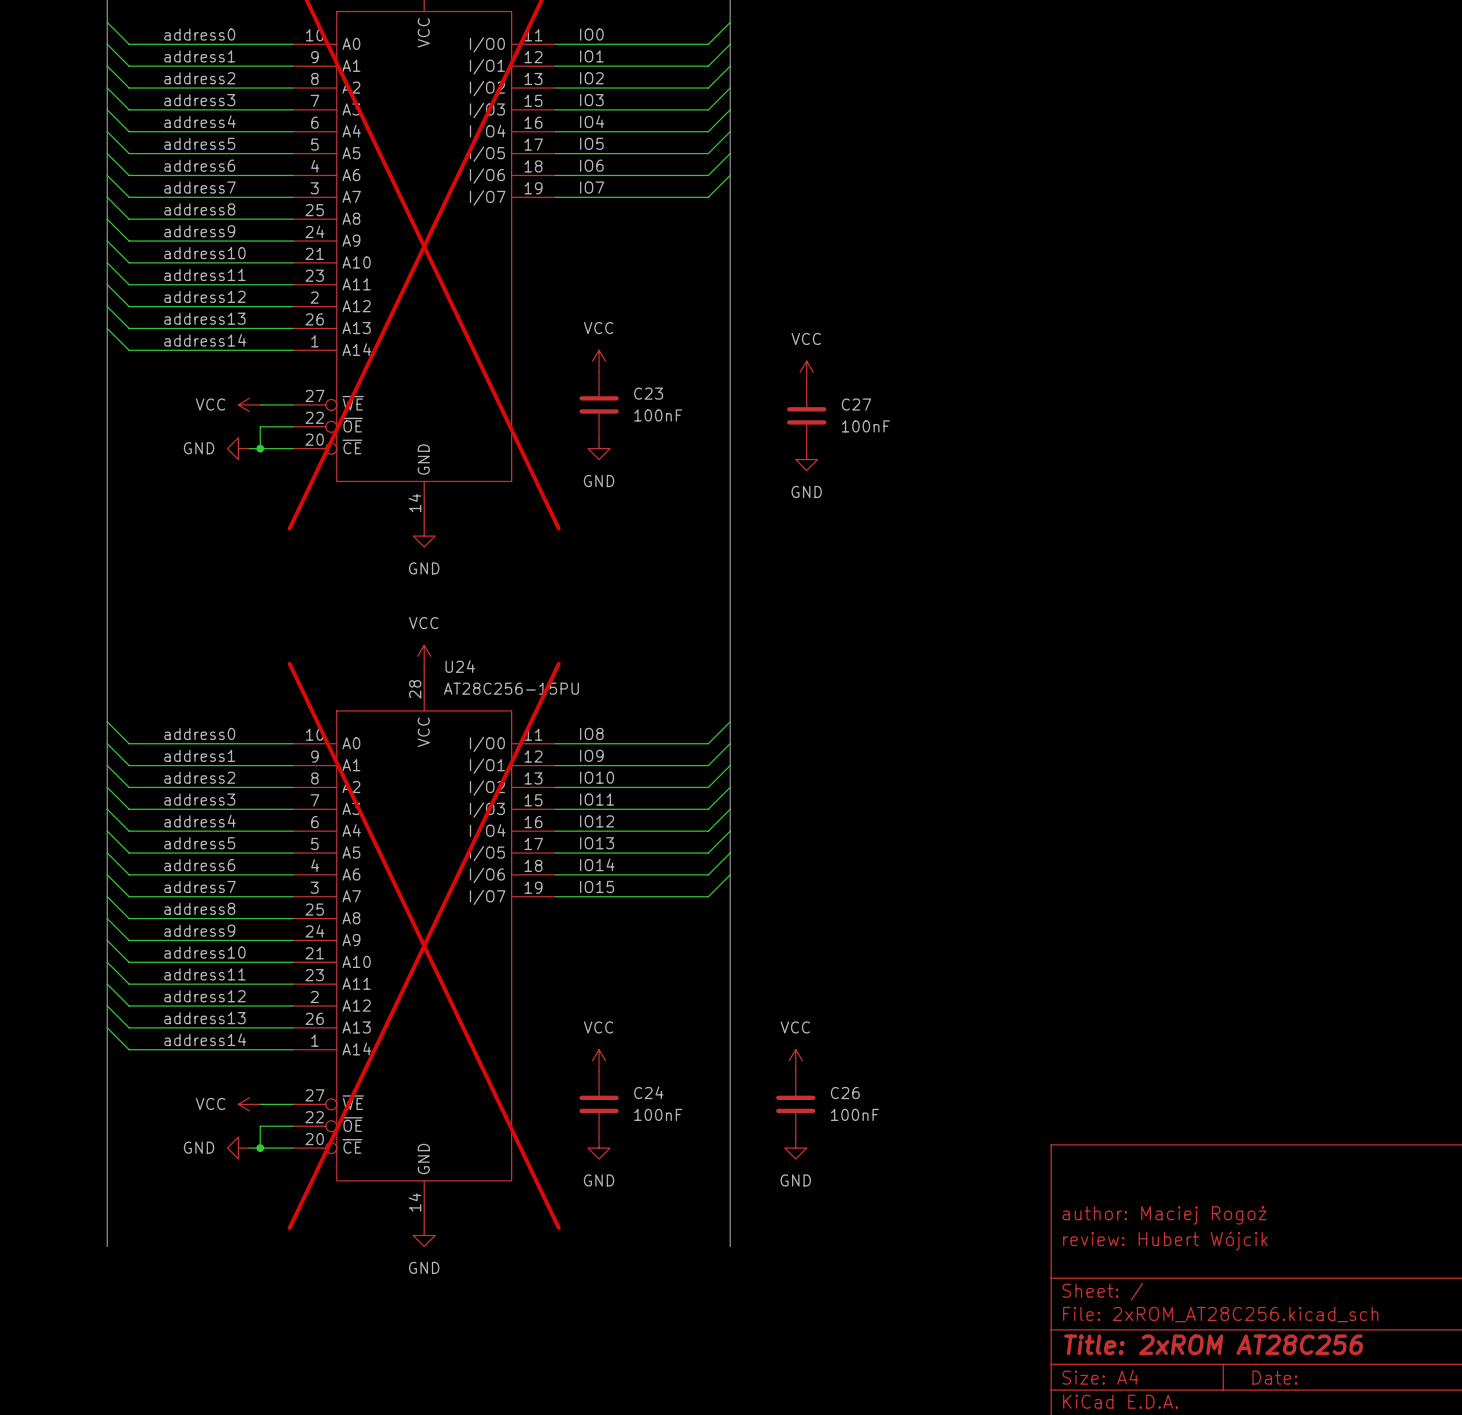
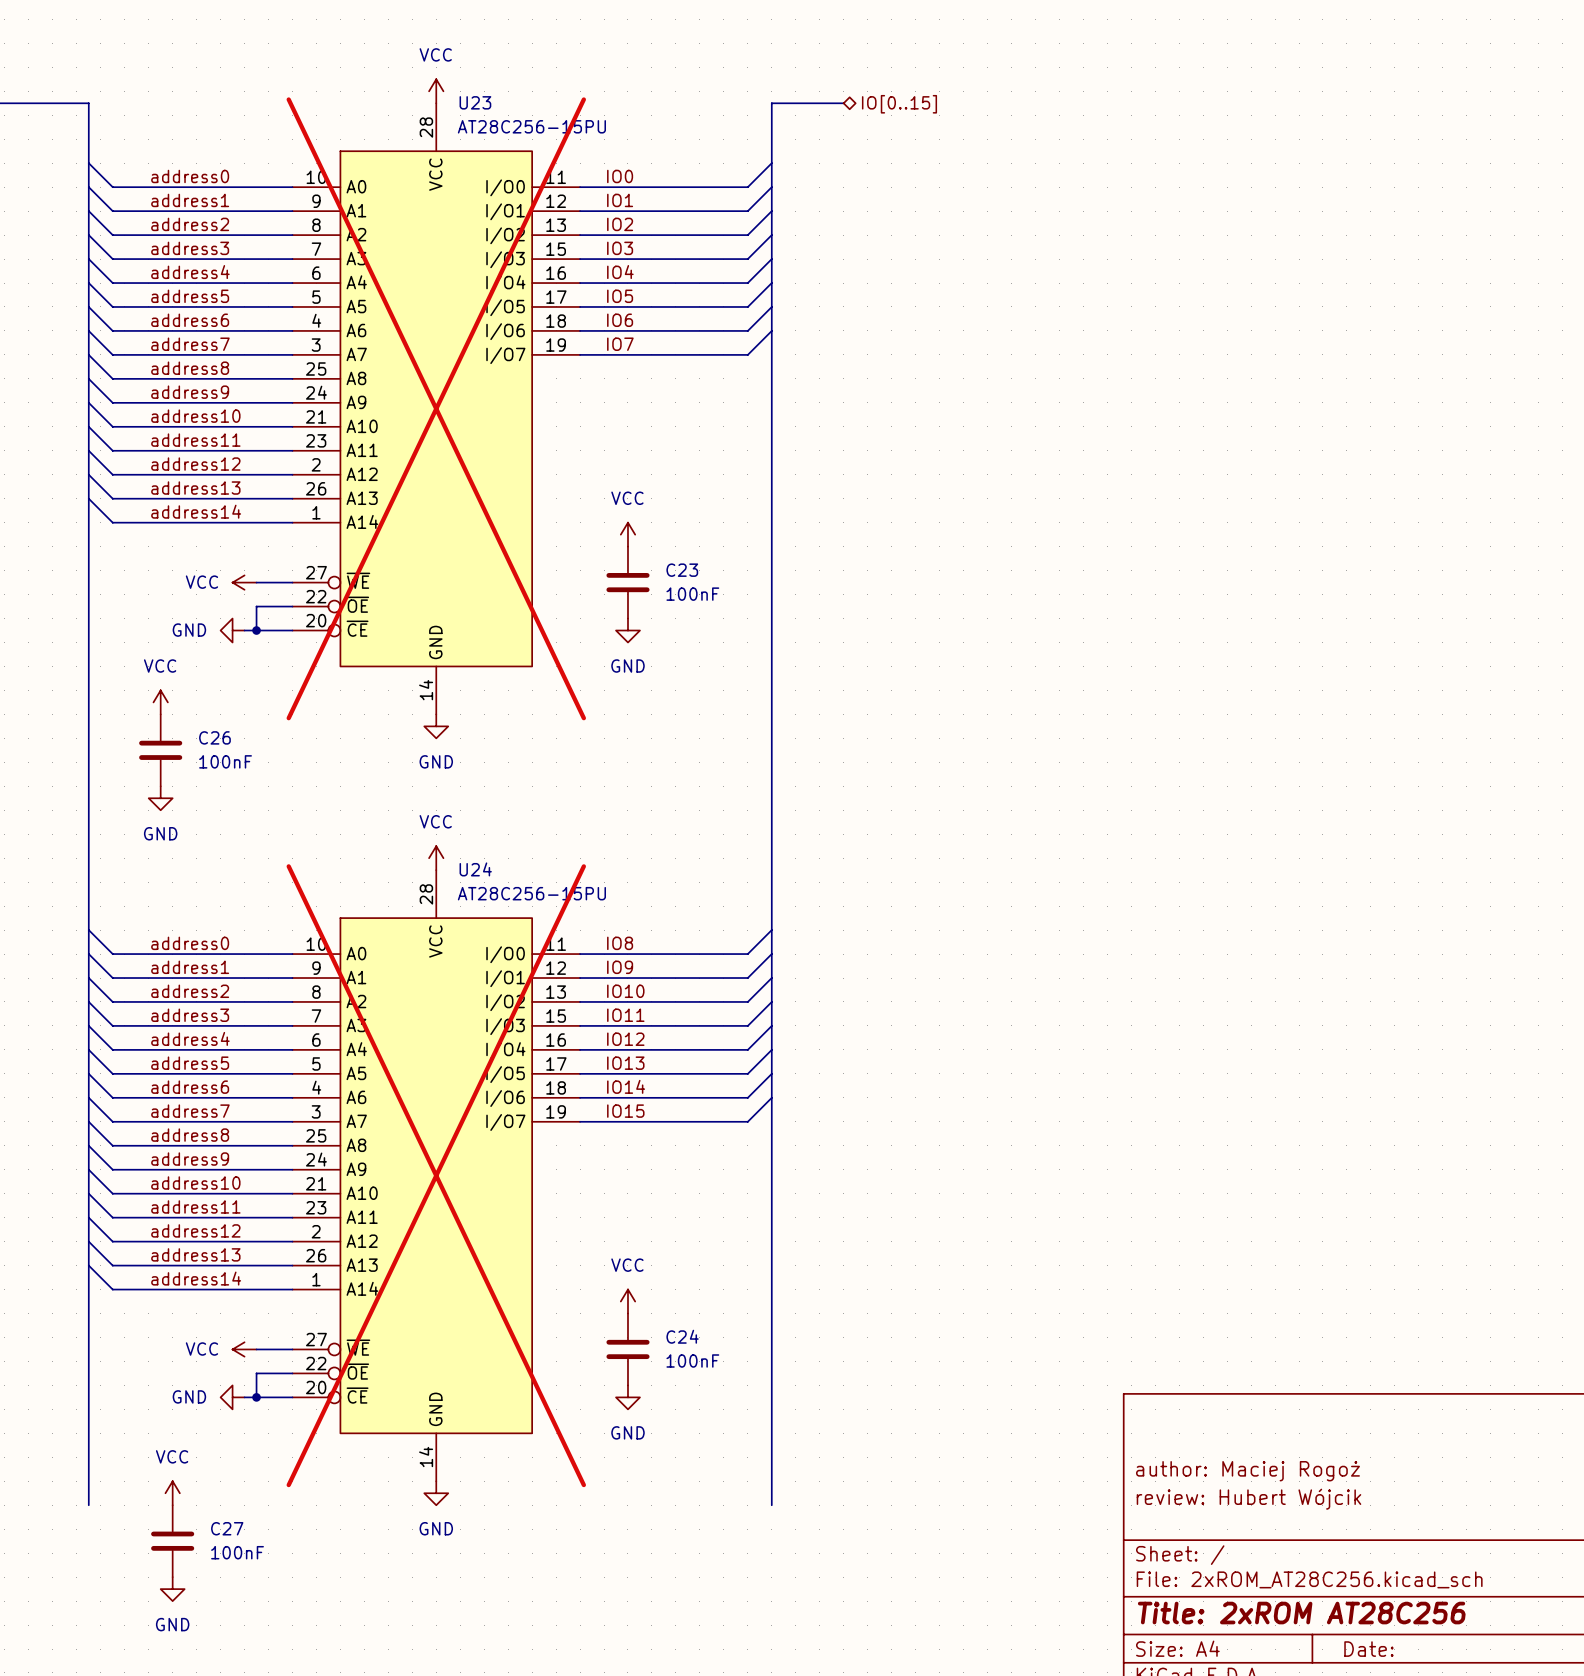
power symbol: VCC (806, 372) -> none
C27 position: (806, 415) -> (172, 1541)
power symbol: GND (806, 459) -> none
power symbol: none -> VCC (160, 702)
power symbol: none -> GND (160, 798)
power symbol: VCC (795, 1060) -> none
C26 position: (795, 1104) -> (160, 750)
power symbol: GND (795, 1148) -> none
power symbol: none -> VCC (172, 1493)
power symbol: none -> GND (172, 1589)

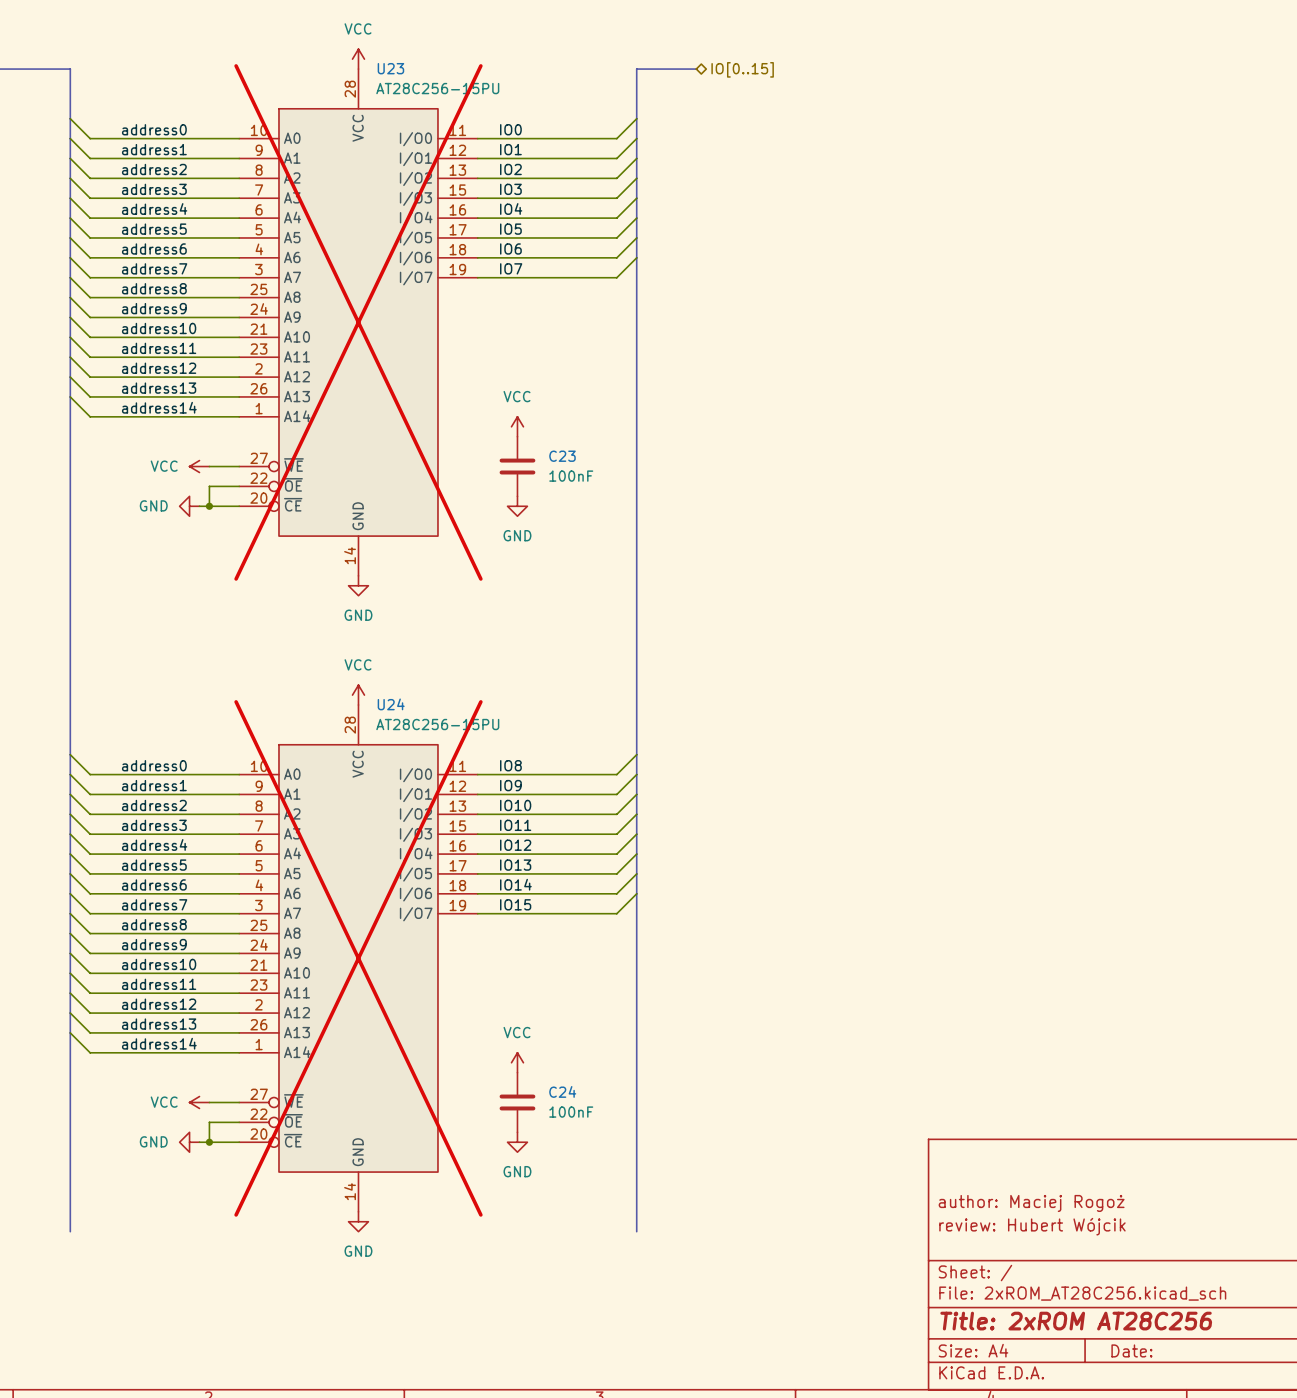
power symbol: VCC (160, 702) -> none
C26: 100nF (160, 750) -> none
power symbol: GND (160, 798) -> none
power symbol: VCC (172, 1493) -> none
C27: 100nF (172, 1541) -> none
power symbol: GND (172, 1589) -> none

